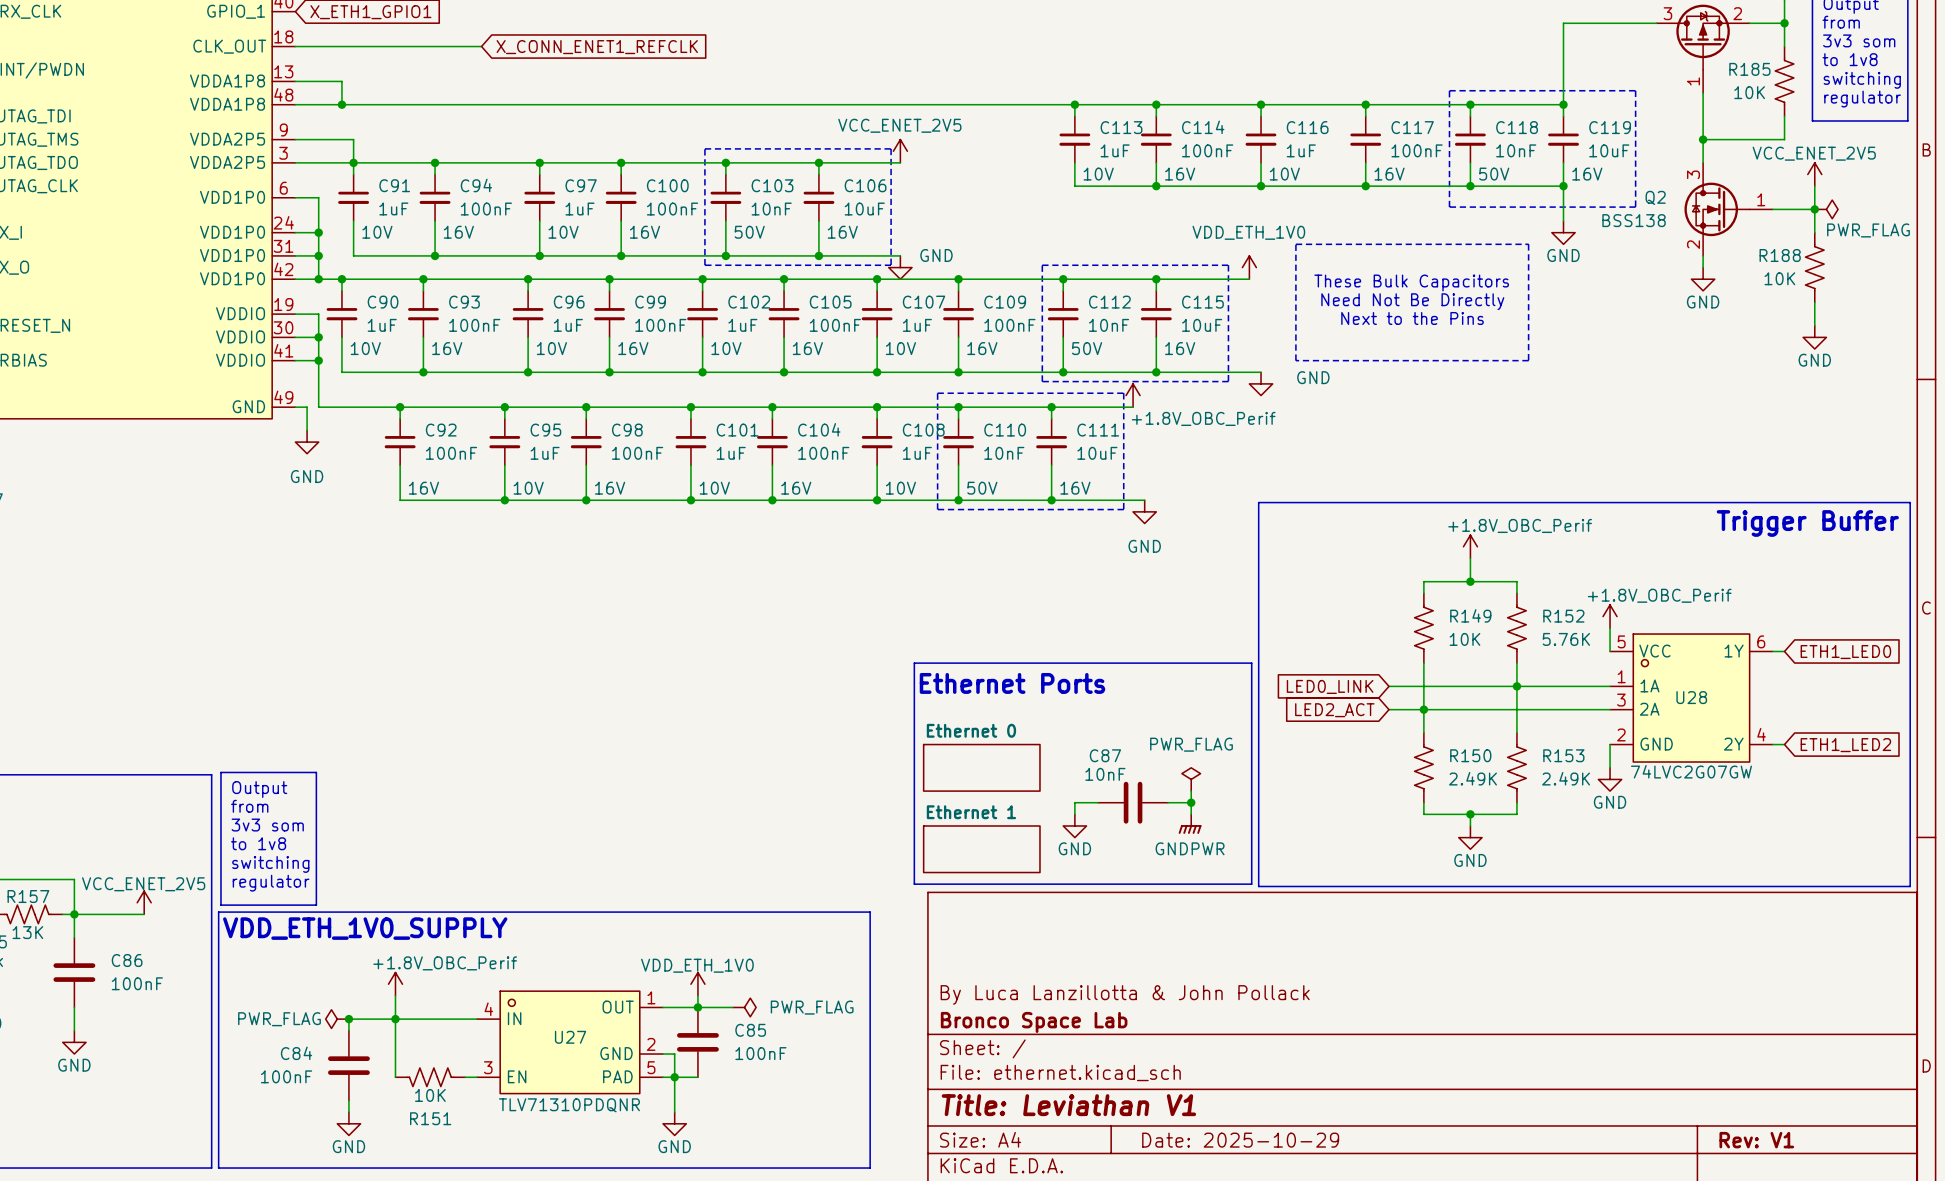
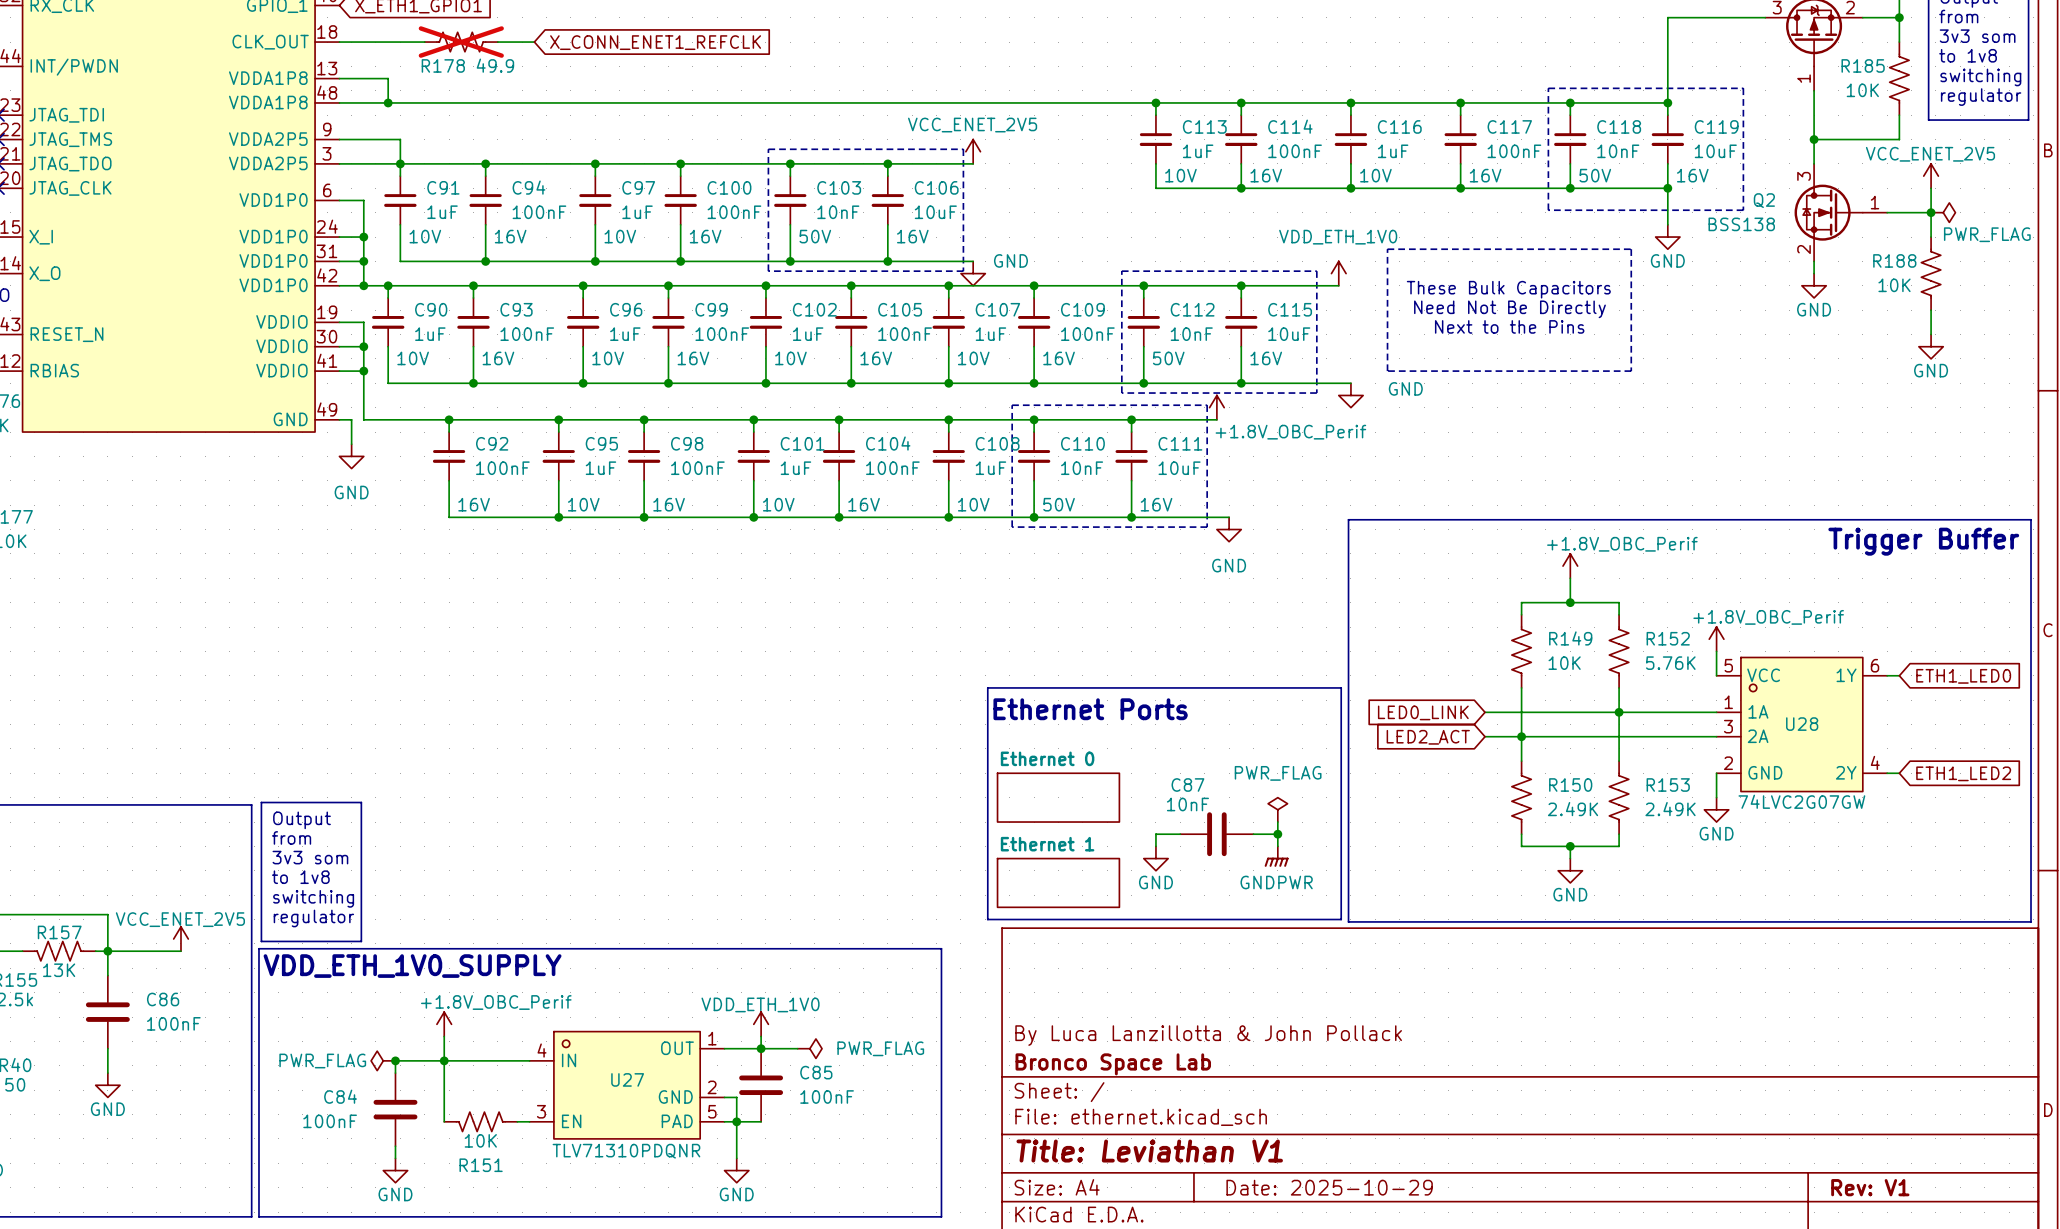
R178: none -> 49.9 (461, 42)

